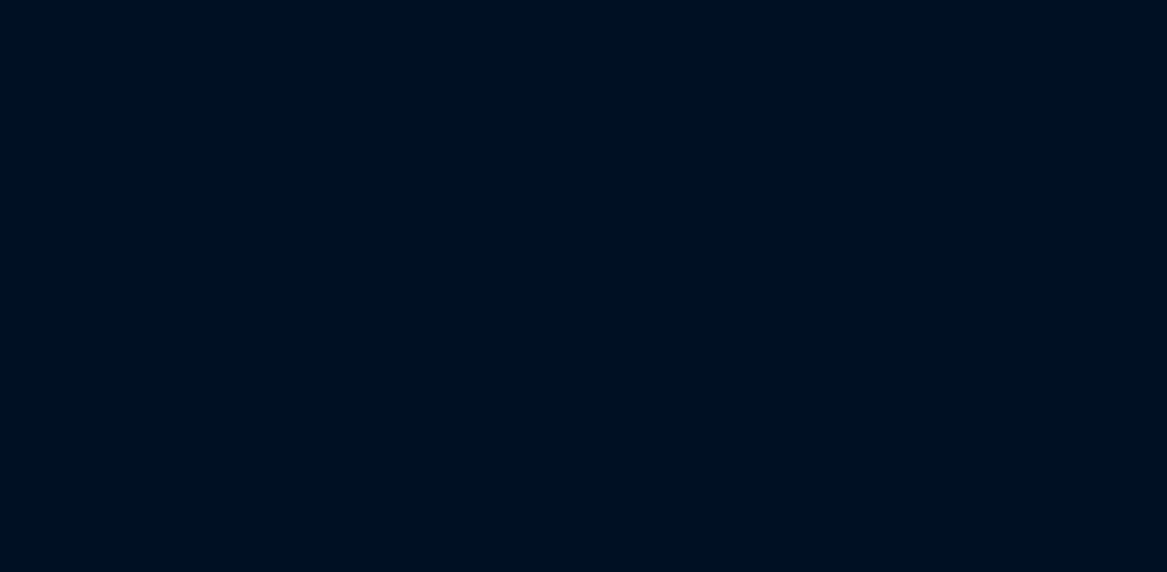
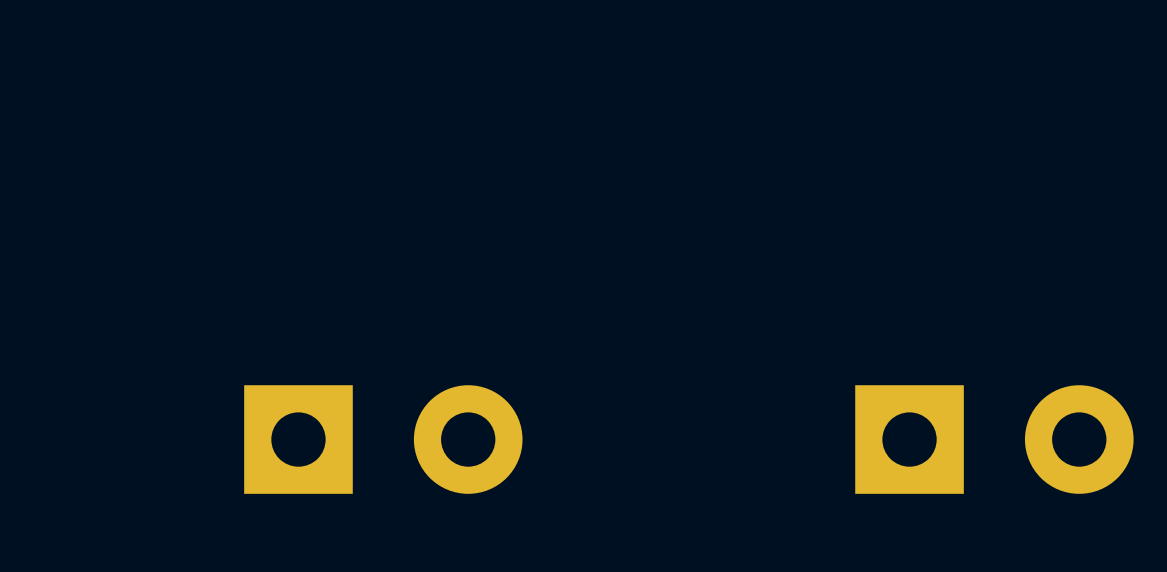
part: none -> (383, 439)
part: none -> (994, 439)

